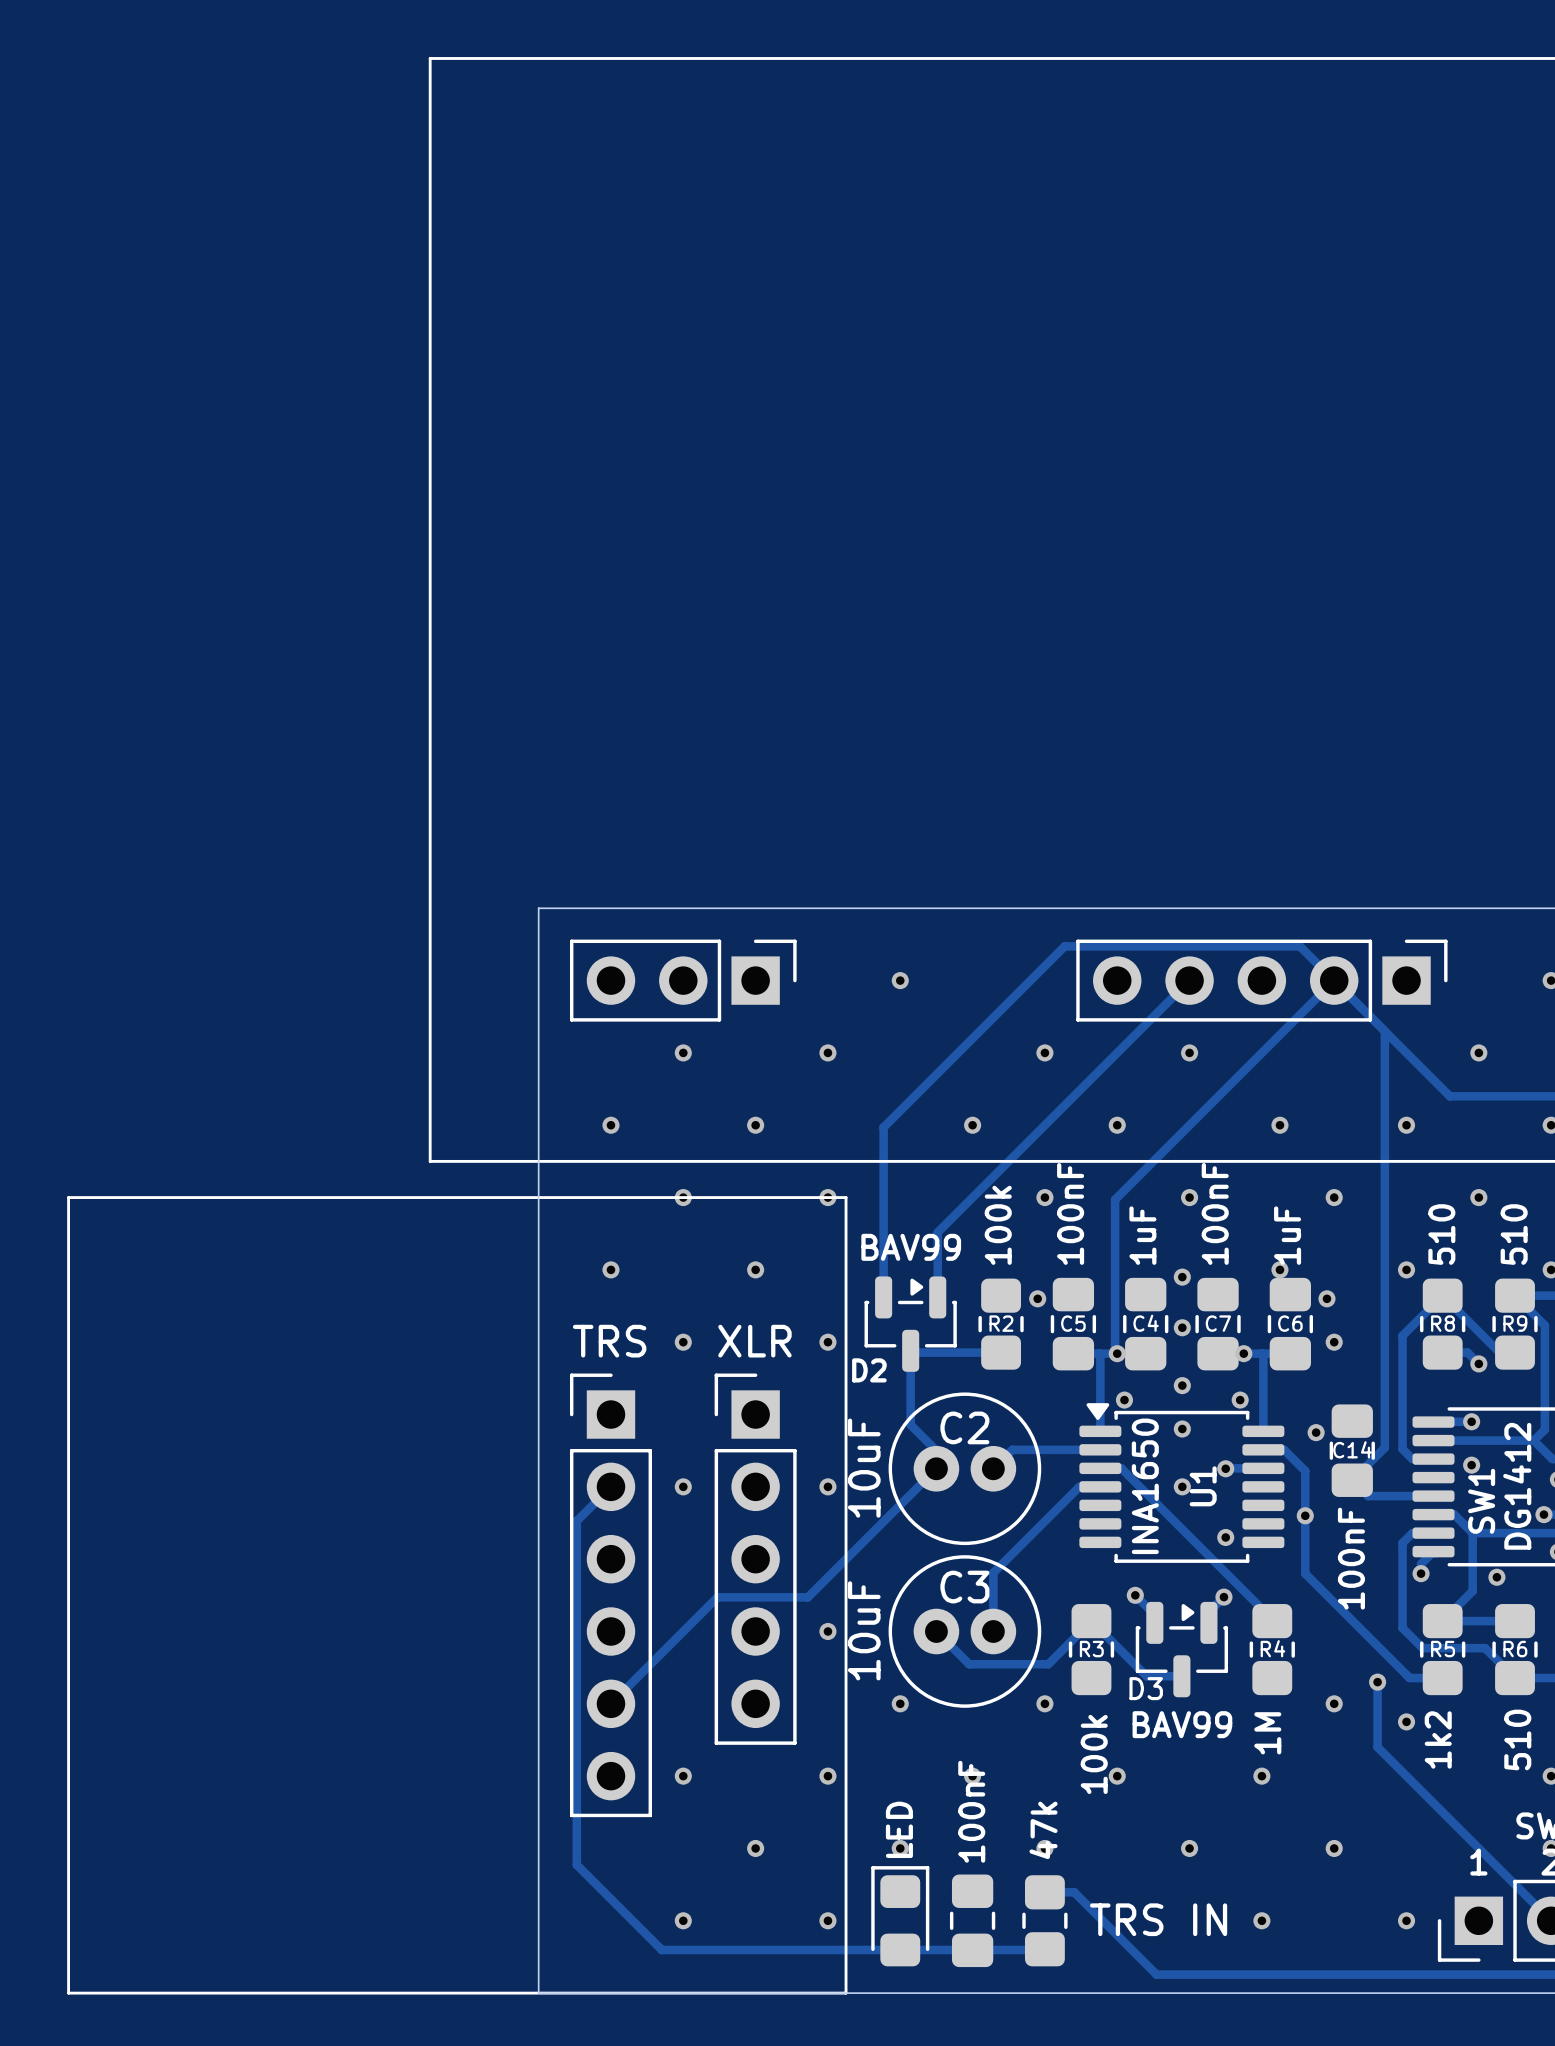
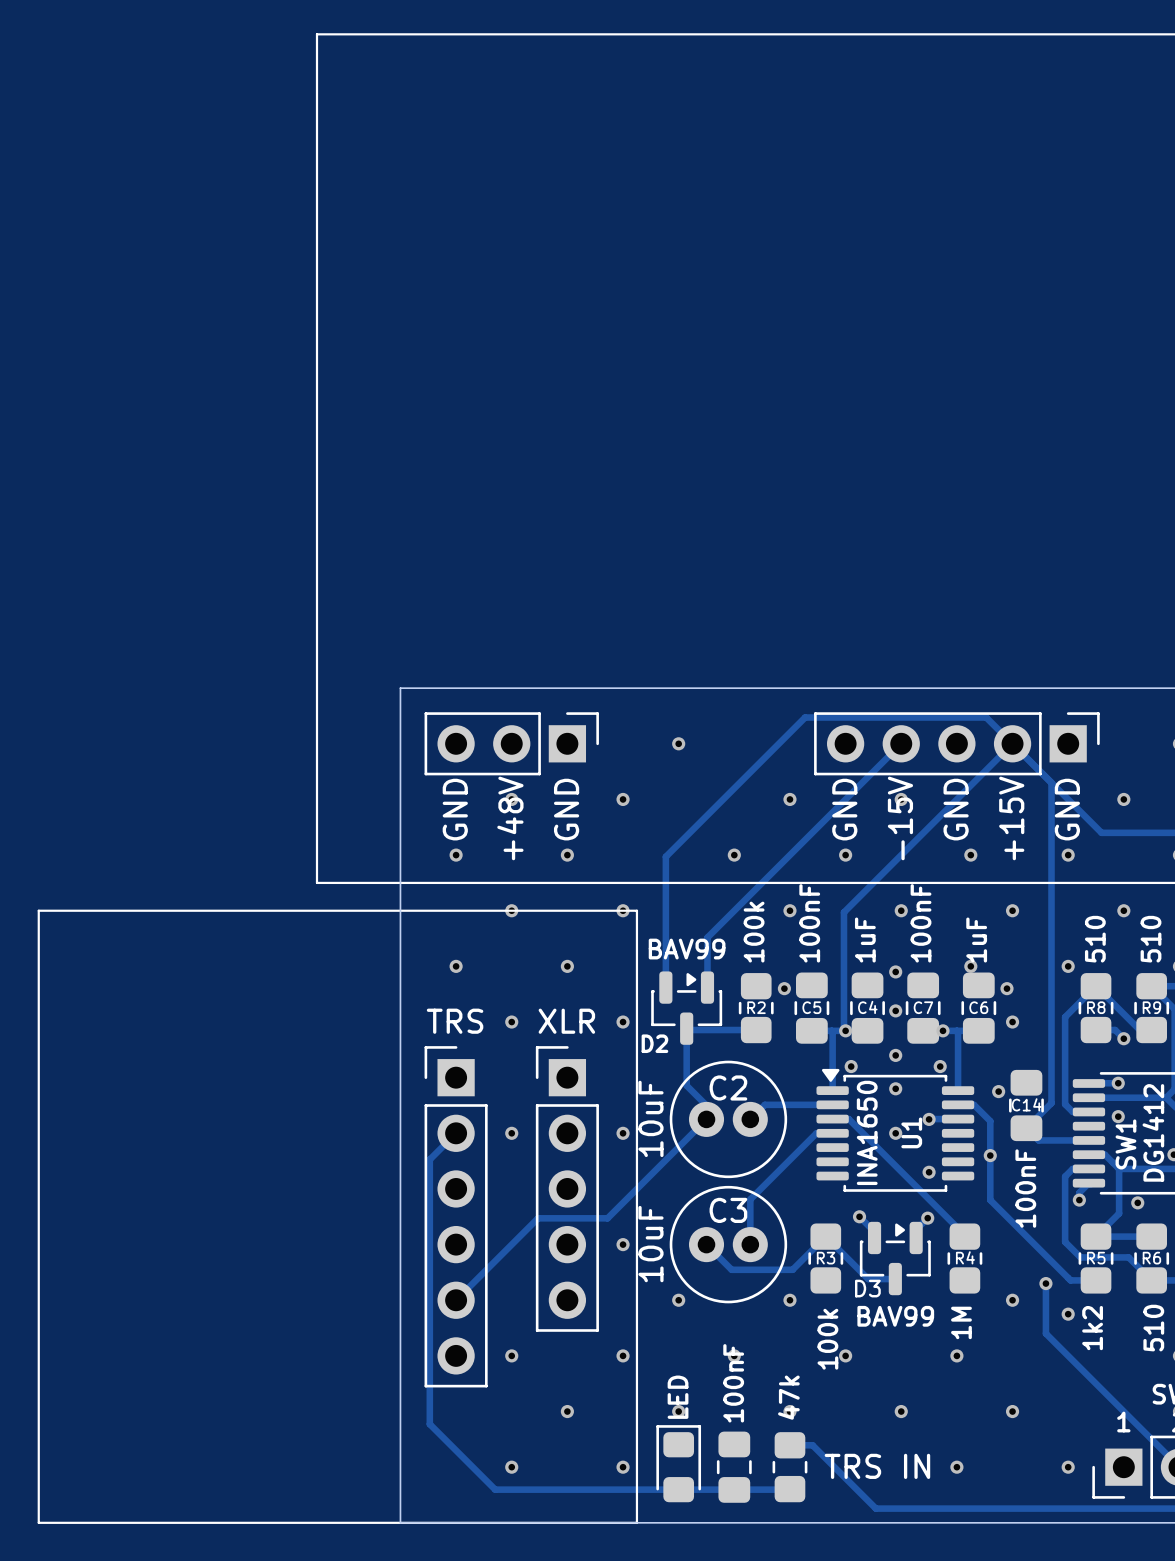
text: none -> GND (455, 809)
text: none -> GND (566, 809)
text: none -> GND (844, 809)
text: none -> GND (956, 809)
text: none -> GND (1067, 809)
text: none -> +48V (510, 818)
text: none -> -15V (900, 818)
text: none -> +15V (1011, 818)

